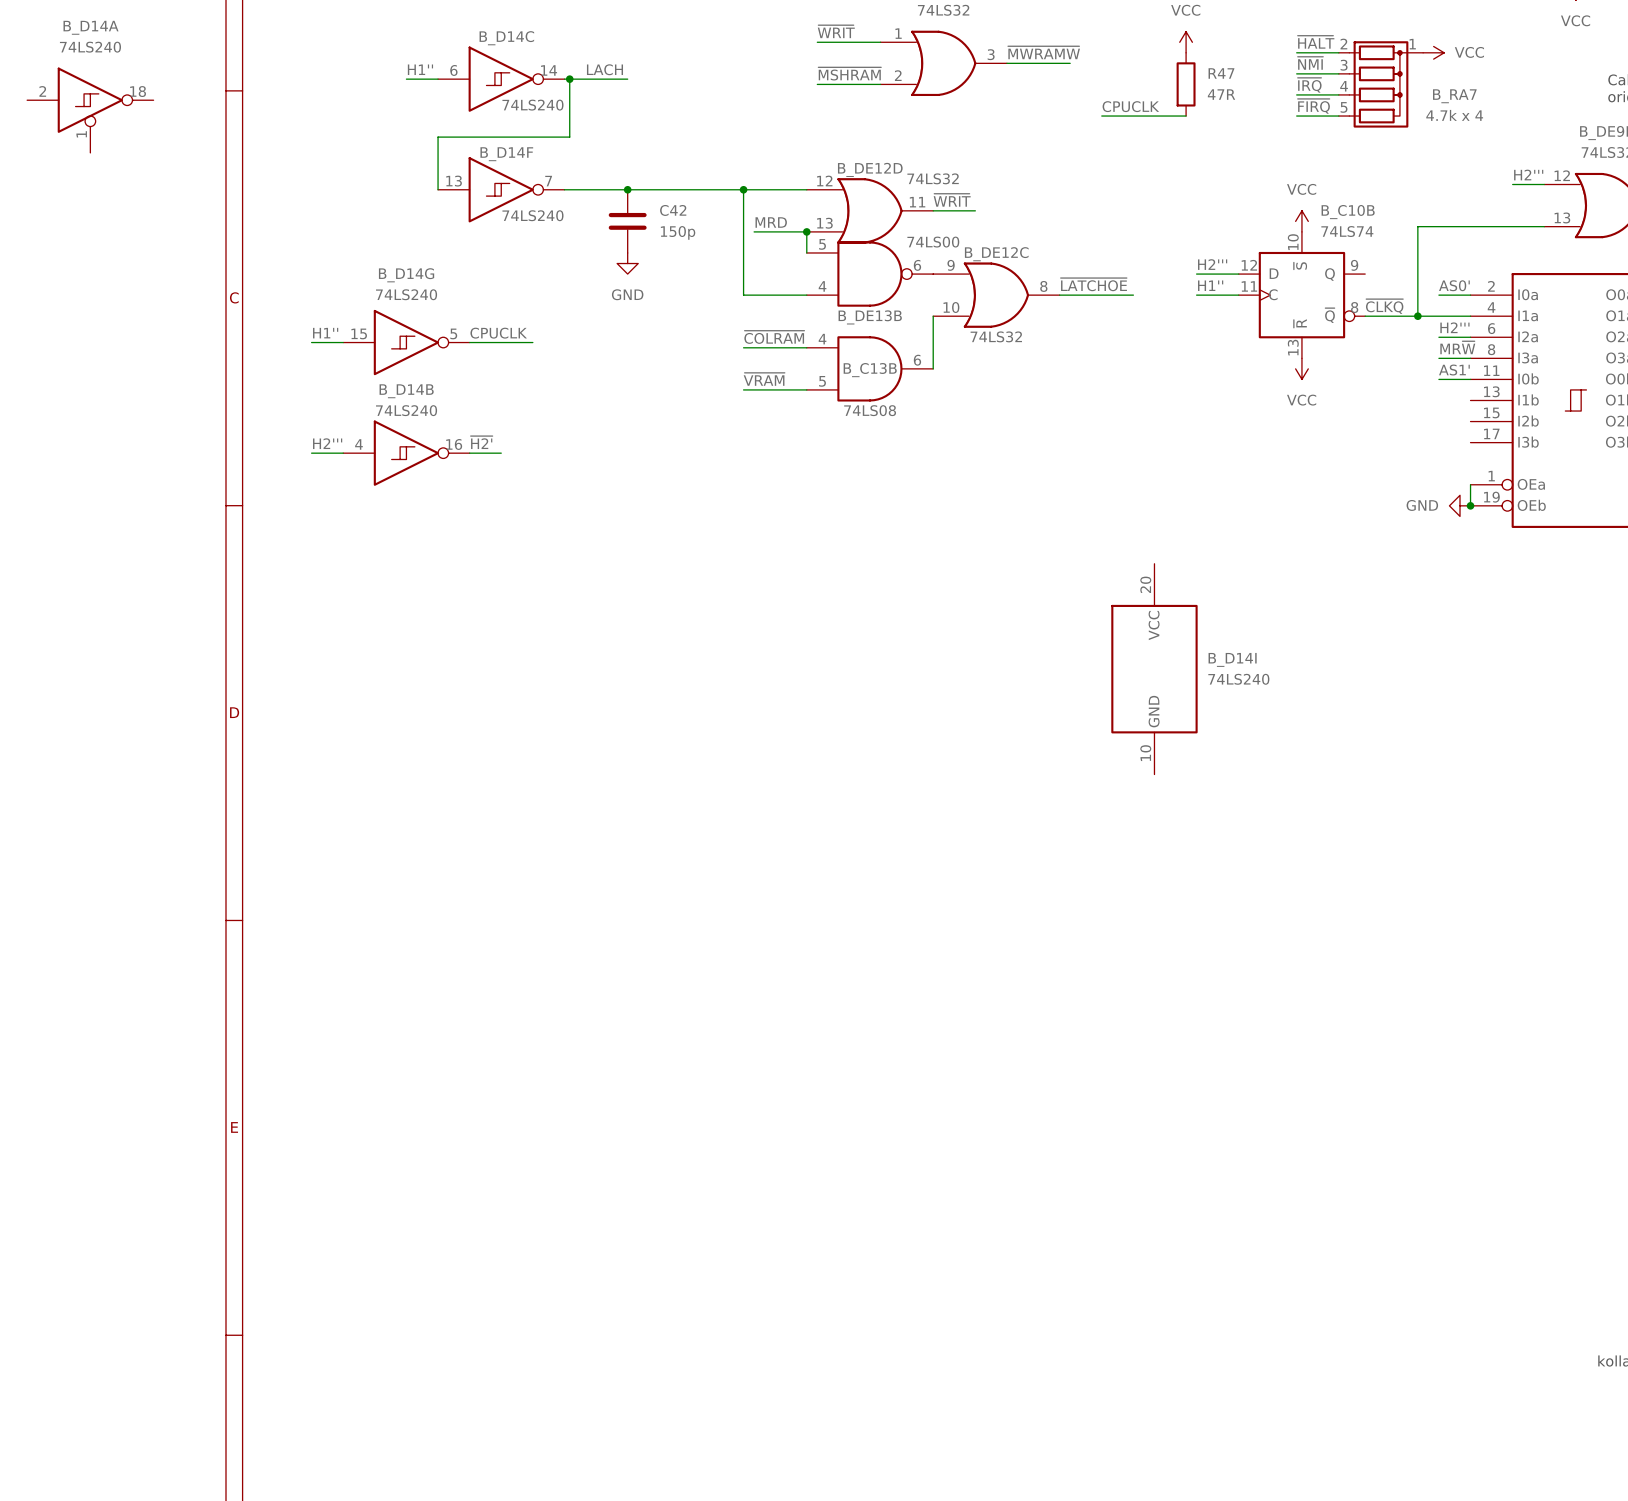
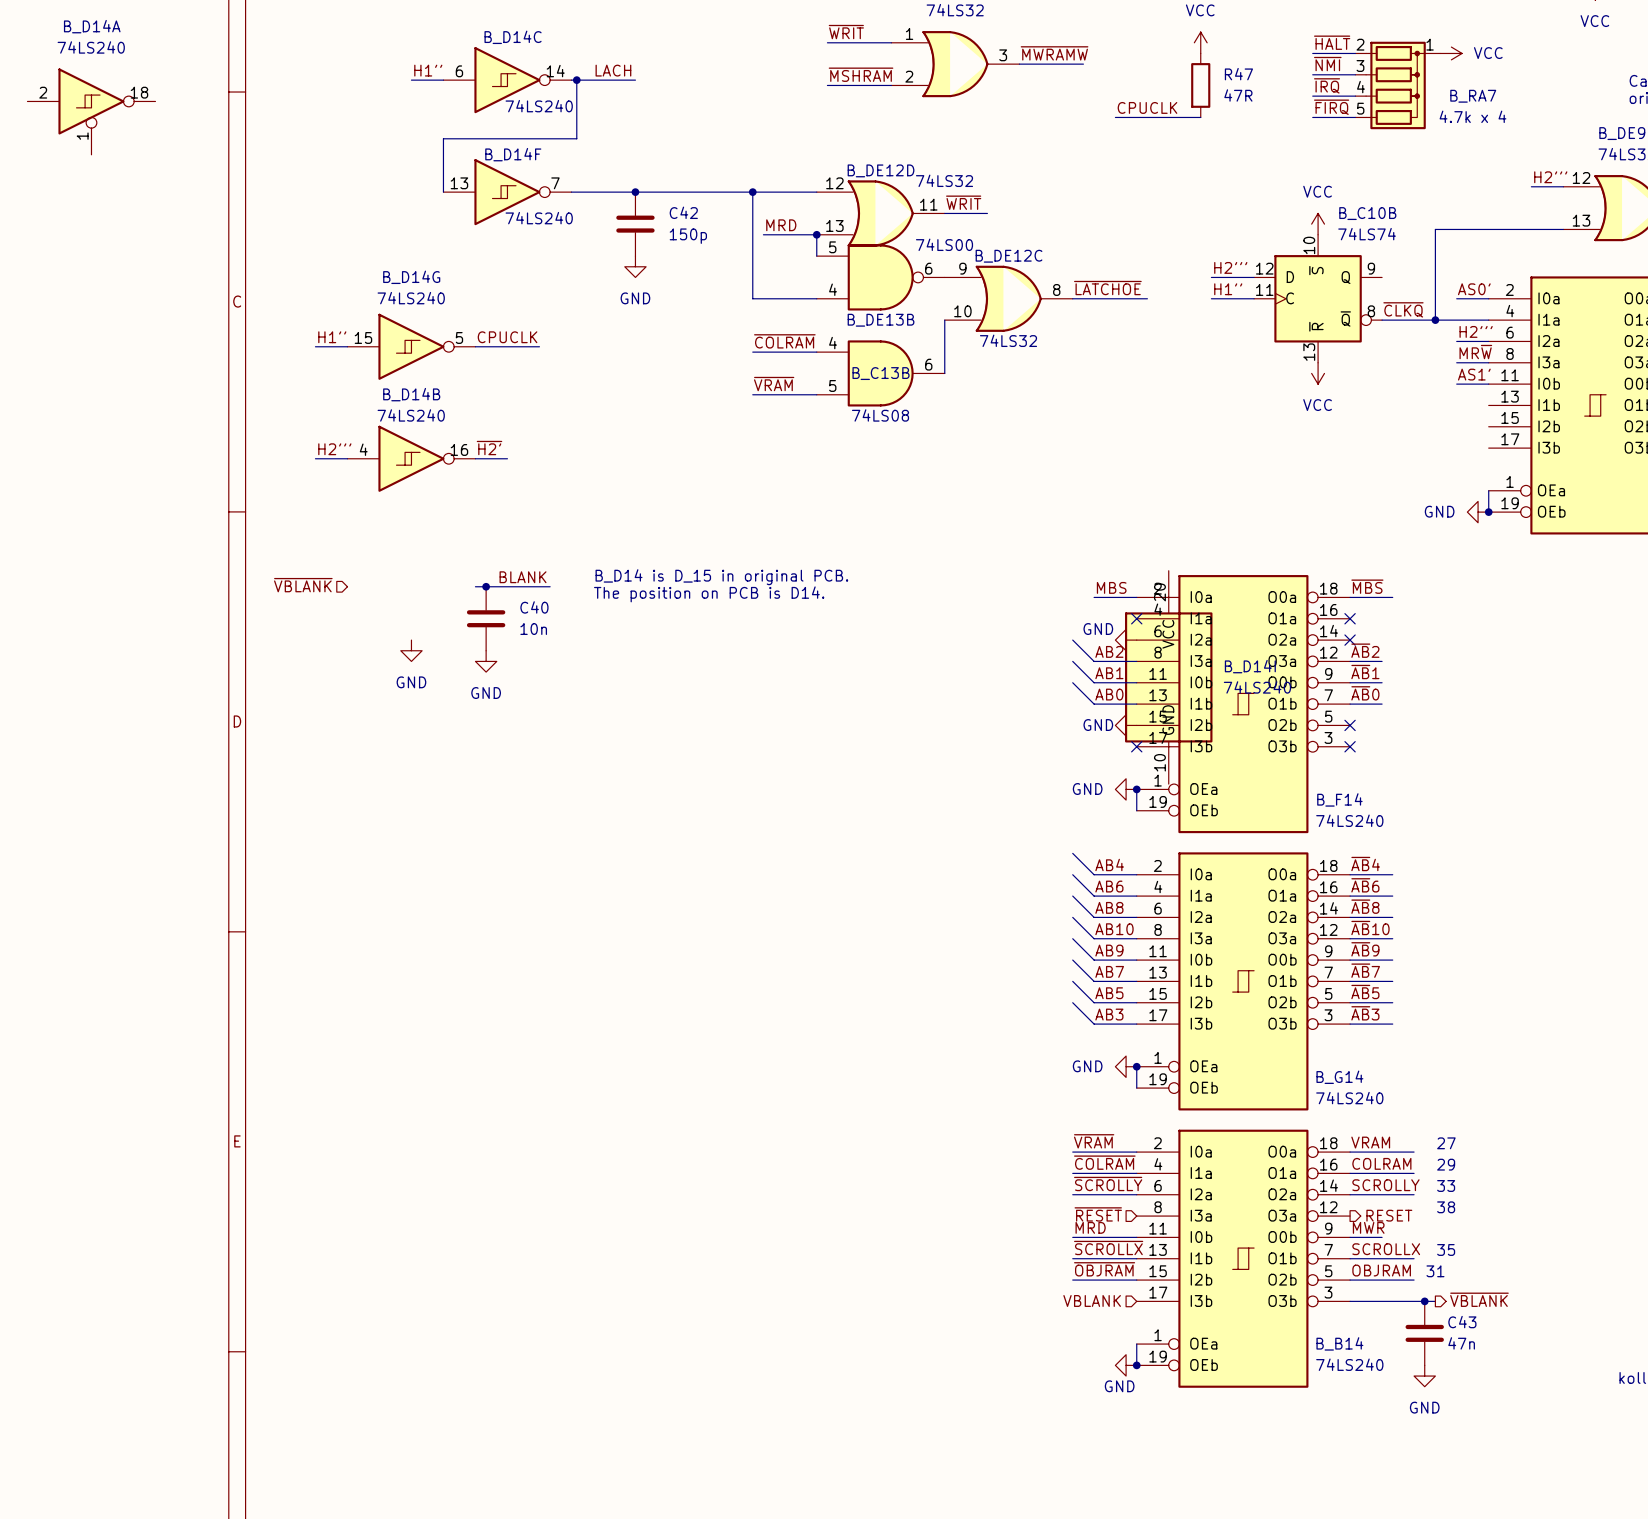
label: none -> BLANK (523, 577)
text: none -> B_D14 is D_15 in original PCB. (721, 577)
hierarchical label: none -> ~{VBLANK} (303, 585)
wire: none -> (475, 586) (550, 586)
junction: none -> (486, 586)
label: none -> ~{MBS} (1367, 586)
label: none -> MBS (1111, 587)
text: none -> The position on PCB is D14. (709, 594)
wire: none -> (1094, 597) (1136, 597)
wire: none -> (1350, 597) (1392, 597)
C40: none -> 10n (486, 618)
no-connect mark: none -> (1136, 618)
no-connect mark: none -> (1350, 618)
wire: none -> (1072, 640) (1094, 661) (1136, 661)
power symbol: none -> GND (1126, 640)
no-connect mark: none -> (1350, 640)
power symbol: none -> GND (411, 650)
label: none -> ~{AB}2 (1365, 650)
label: none -> AB2 (1109, 651)
power symbol: none -> GND (486, 661)
wire: none -> (1072, 661) (1094, 682) (1136, 682)
wire: none -> (1350, 661) (1382, 661)
label: none -> ~{AB}1 (1365, 672)
label: none -> AB1 (1109, 673)
wire: none -> (1072, 682) (1094, 704) (1136, 704)
wire: none -> (1350, 682) (1382, 682)
label: none -> ~{AB}0 (1365, 693)
label: none -> AB0 (1109, 694)
B_F14: none -> 74LS240 (1243, 704)
wire: none -> (1350, 704) (1382, 704)
power symbol: none -> GND (1126, 725)
no-connect mark: none -> (1350, 725)
no-connect mark: none -> (1136, 746)
no-connect mark: none -> (1350, 746)
power symbol: none -> GND (1126, 789)
wire: none -> (1136, 789) (1136, 810)
junction: none -> (1136, 789)
wire: none -> (1072, 853) (1094, 874) (1136, 874)
label: none -> ~{AB}4 (1365, 864)
label: none -> AB4 (1109, 864)
wire: none -> (1072, 874) (1094, 896) (1136, 896)
wire: none -> (1350, 874) (1392, 874)
label: none -> ~{AB}6 (1365, 885)
label: none -> AB6 (1109, 886)
wire: none -> (1072, 896) (1094, 917) (1136, 917)
wire: none -> (1350, 896) (1392, 896)
label: none -> ~{AB}8 (1365, 906)
label: none -> AB8 (1109, 907)
wire: none -> (1072, 917) (1094, 938) (1136, 938)
wire: none -> (1350, 917) (1392, 917)
label: none -> ~{AB}10 (1370, 927)
label: none -> AB10 (1114, 929)
wire: none -> (1072, 938) (1094, 960) (1136, 960)
wire: none -> (1350, 938) (1392, 938)
label: none -> ~{AB}9 (1365, 949)
label: none -> AB9 (1109, 950)
wire: none -> (1072, 960) (1094, 981) (1136, 981)
wire: none -> (1350, 960) (1392, 960)
label: none -> ~{AB}7 (1365, 970)
label: none -> AB7 (1109, 971)
wire: none -> (1072, 981) (1094, 1002) (1136, 1002)
B_G14: none -> 74LS240 (1243, 981)
wire: none -> (1350, 981) (1392, 981)
label: none -> ~{AB}5 (1365, 991)
label: none -> AB5 (1109, 993)
wire: none -> (1072, 1002) (1094, 1024) (1136, 1024)
wire: none -> (1350, 1002) (1392, 1002)
label: none -> ~{AB}3 (1365, 1013)
label: none -> AB3 (1109, 1014)
wire: none -> (1350, 1024) (1392, 1024)
power symbol: none -> GND (1126, 1066)
wire: none -> (1136, 1066) (1136, 1088)
junction: none -> (1136, 1066)
label: none -> ~{VRAM} (1094, 1141)
label: none -> VRAM (1370, 1142)
text: none -> 27 (1446, 1143)
wire: none -> (1072, 1152) (1136, 1152)
wire: none -> (1350, 1152) (1414, 1152)
label: none -> ~{COLRAM} (1104, 1162)
label: none -> COLRAM (1381, 1163)
text: none -> 29 (1446, 1164)
wire: none -> (1072, 1173) (1136, 1173)
wire: none -> (1350, 1173) (1414, 1173)
label: none -> ~{SCROLLY} (1108, 1183)
label: none -> SCROLLY (1385, 1185)
text: none -> 33 (1446, 1185)
wire: none -> (1072, 1194) (1136, 1194)
wire: none -> (1350, 1194) (1414, 1194)
text: none -> 38 (1446, 1207)
hierarchical label: none -> ~{RESET} (1098, 1214)
hierarchical label: none -> RESET (1389, 1215)
label: none -> MRD (1090, 1227)
label: none -> MWR (1368, 1227)
wire: none -> (1072, 1237) (1136, 1237)
wire: none -> (1350, 1237) (1382, 1237)
label: none -> ~{SCROLLX} (1108, 1247)
label: none -> SCROLLX (1386, 1249)
text: none -> 35 (1446, 1249)
wire: none -> (1072, 1258) (1136, 1258)
B_B14: none -> 74LS240 (1243, 1258)
wire: none -> (1350, 1258) (1414, 1258)
label: none -> ~{OBJRAM} (1104, 1269)
text: none -> 31 (1435, 1271)
label: none -> OBJRAM (1381, 1270)
wire: none -> (1072, 1280) (1136, 1280)
wire: none -> (1350, 1280) (1414, 1280)
hierarchical label: none -> ~{VBLANK} (1479, 1299)
hierarchical label: none -> VBLANK (1092, 1300)
wire: none -> (1350, 1301) (1435, 1301)
junction: none -> (1424, 1301)
C43: none -> 47n (1424, 1333)
wire: none -> (1136, 1344) (1136, 1365)
power symbol: none -> GND (1126, 1365)
junction: none -> (1136, 1365)
power symbol: none -> GND (1424, 1376)

